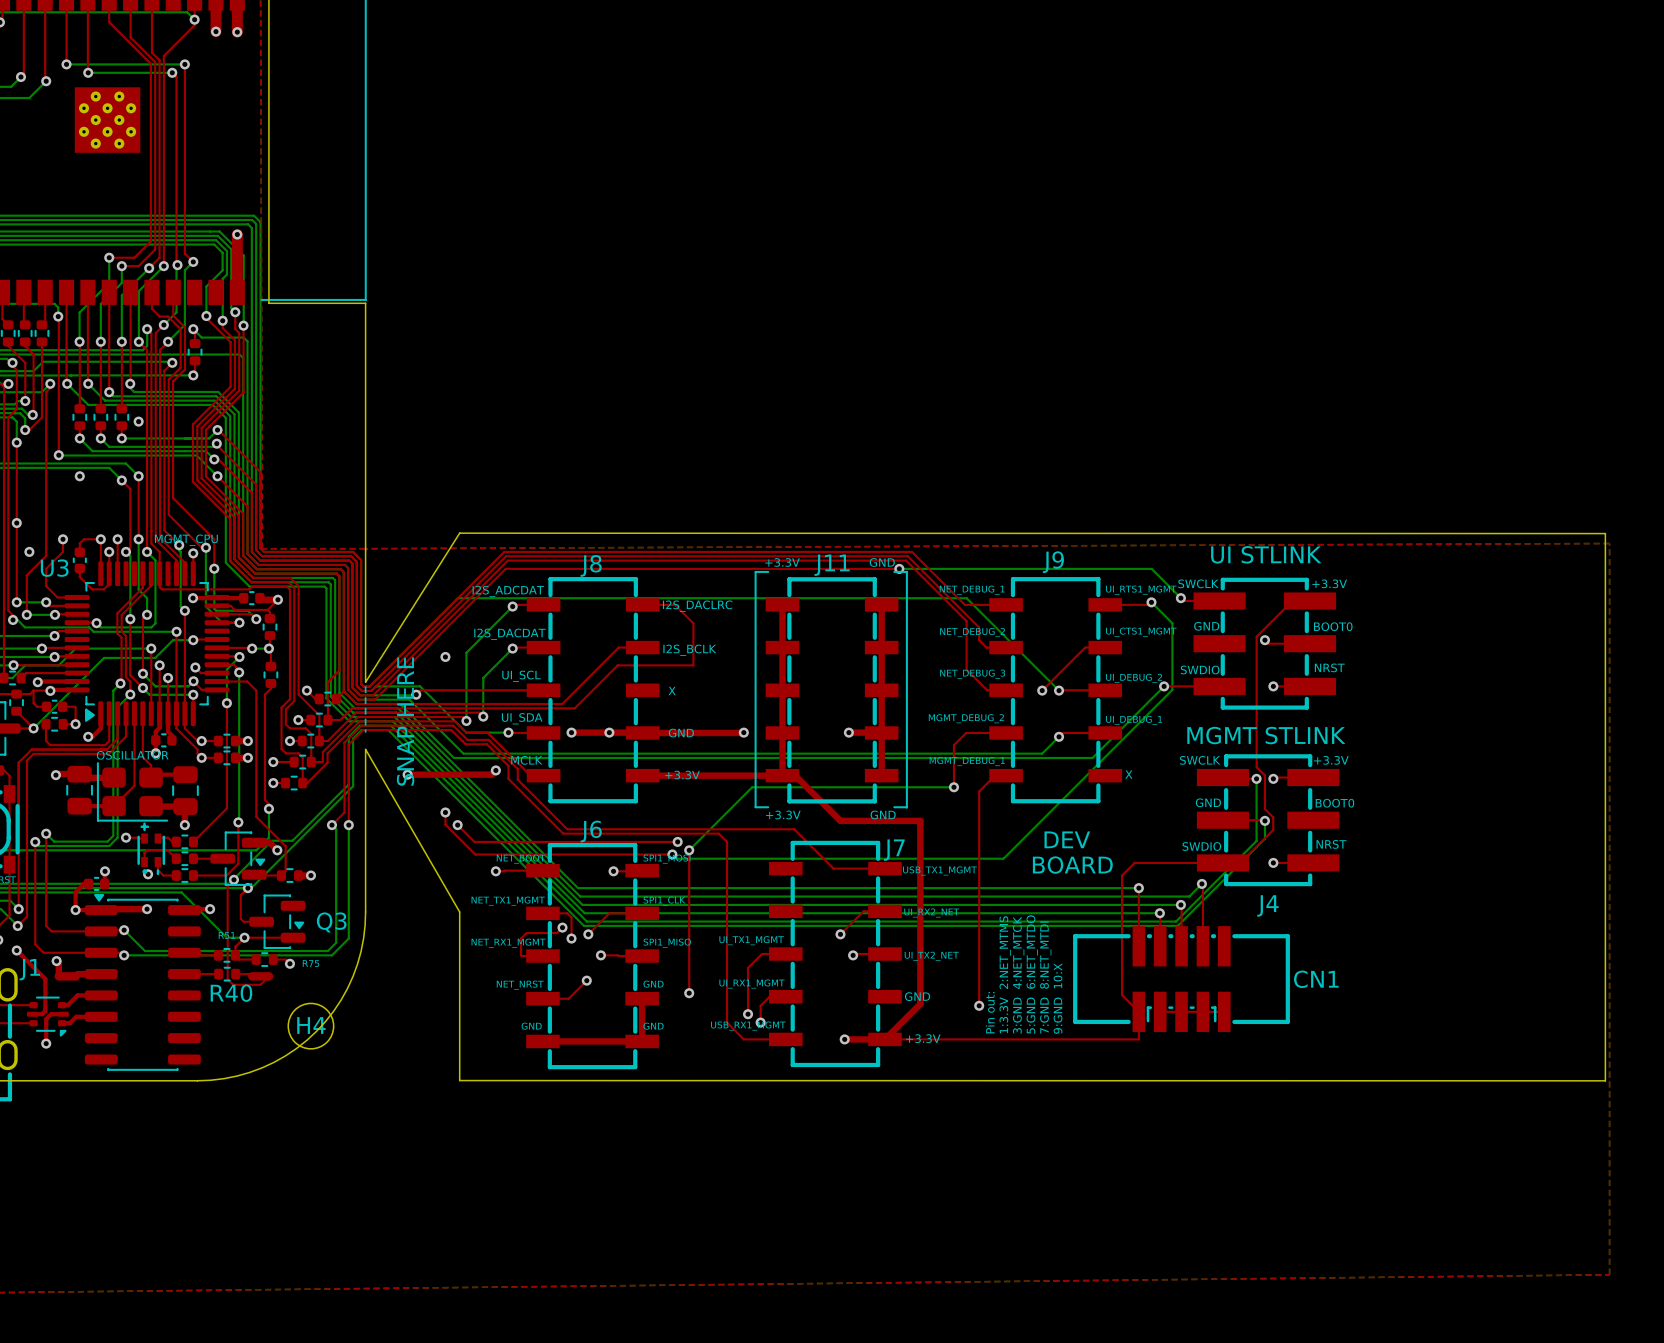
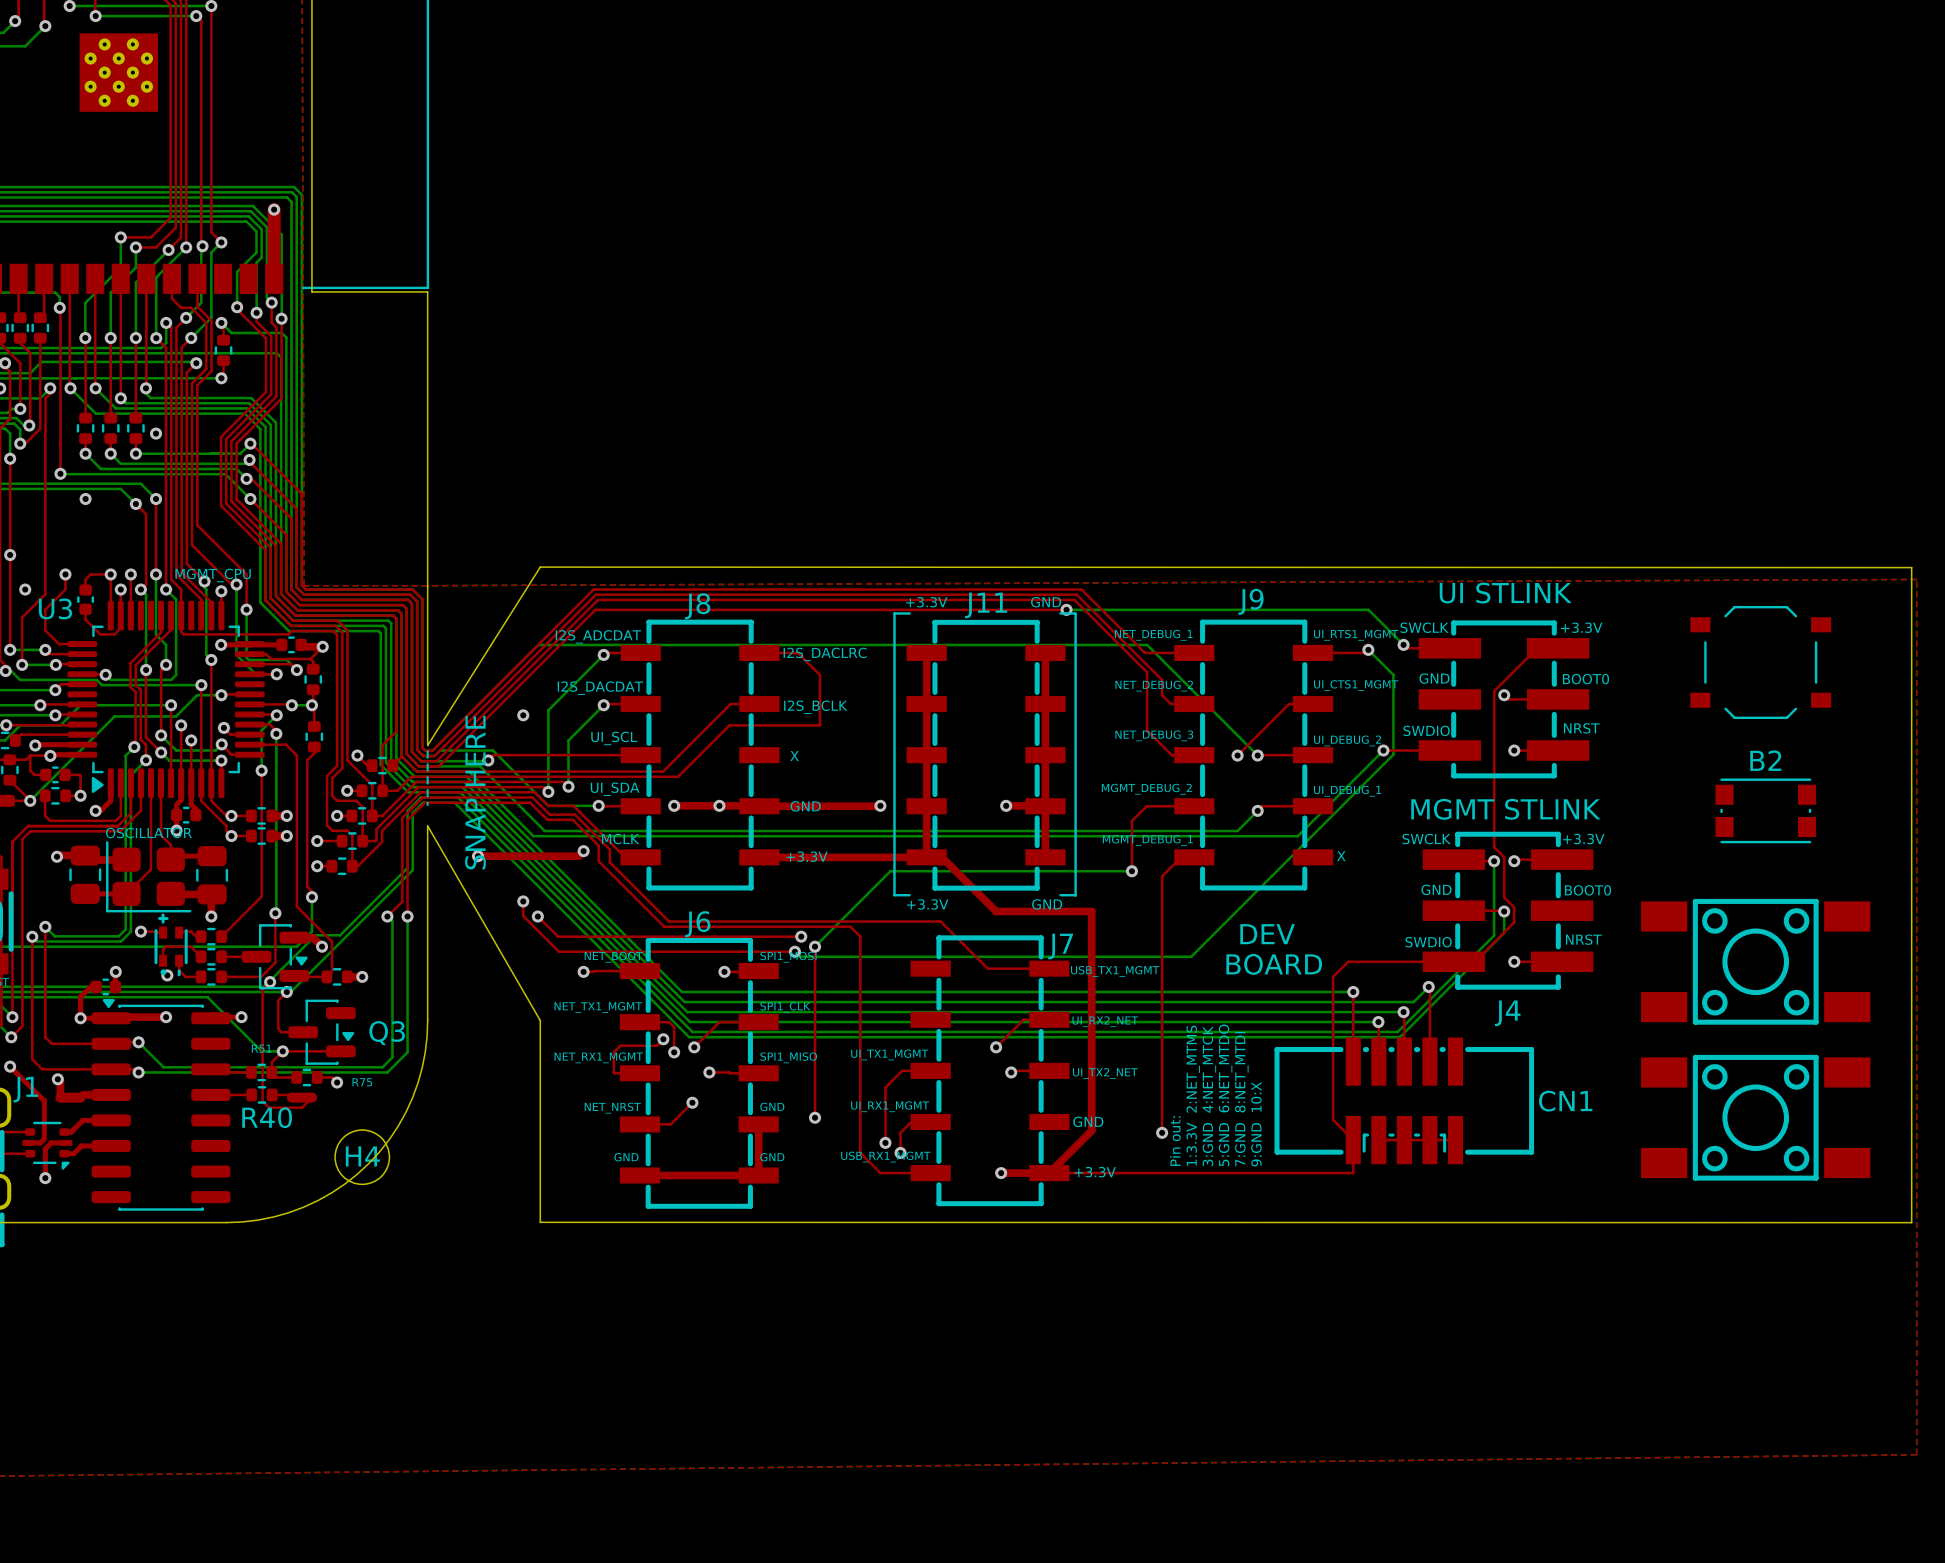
part: none -> (1760, 662)
B2: none -> (1765, 810)
part: none -> (1755, 961)
part: none -> (1755, 1117)

